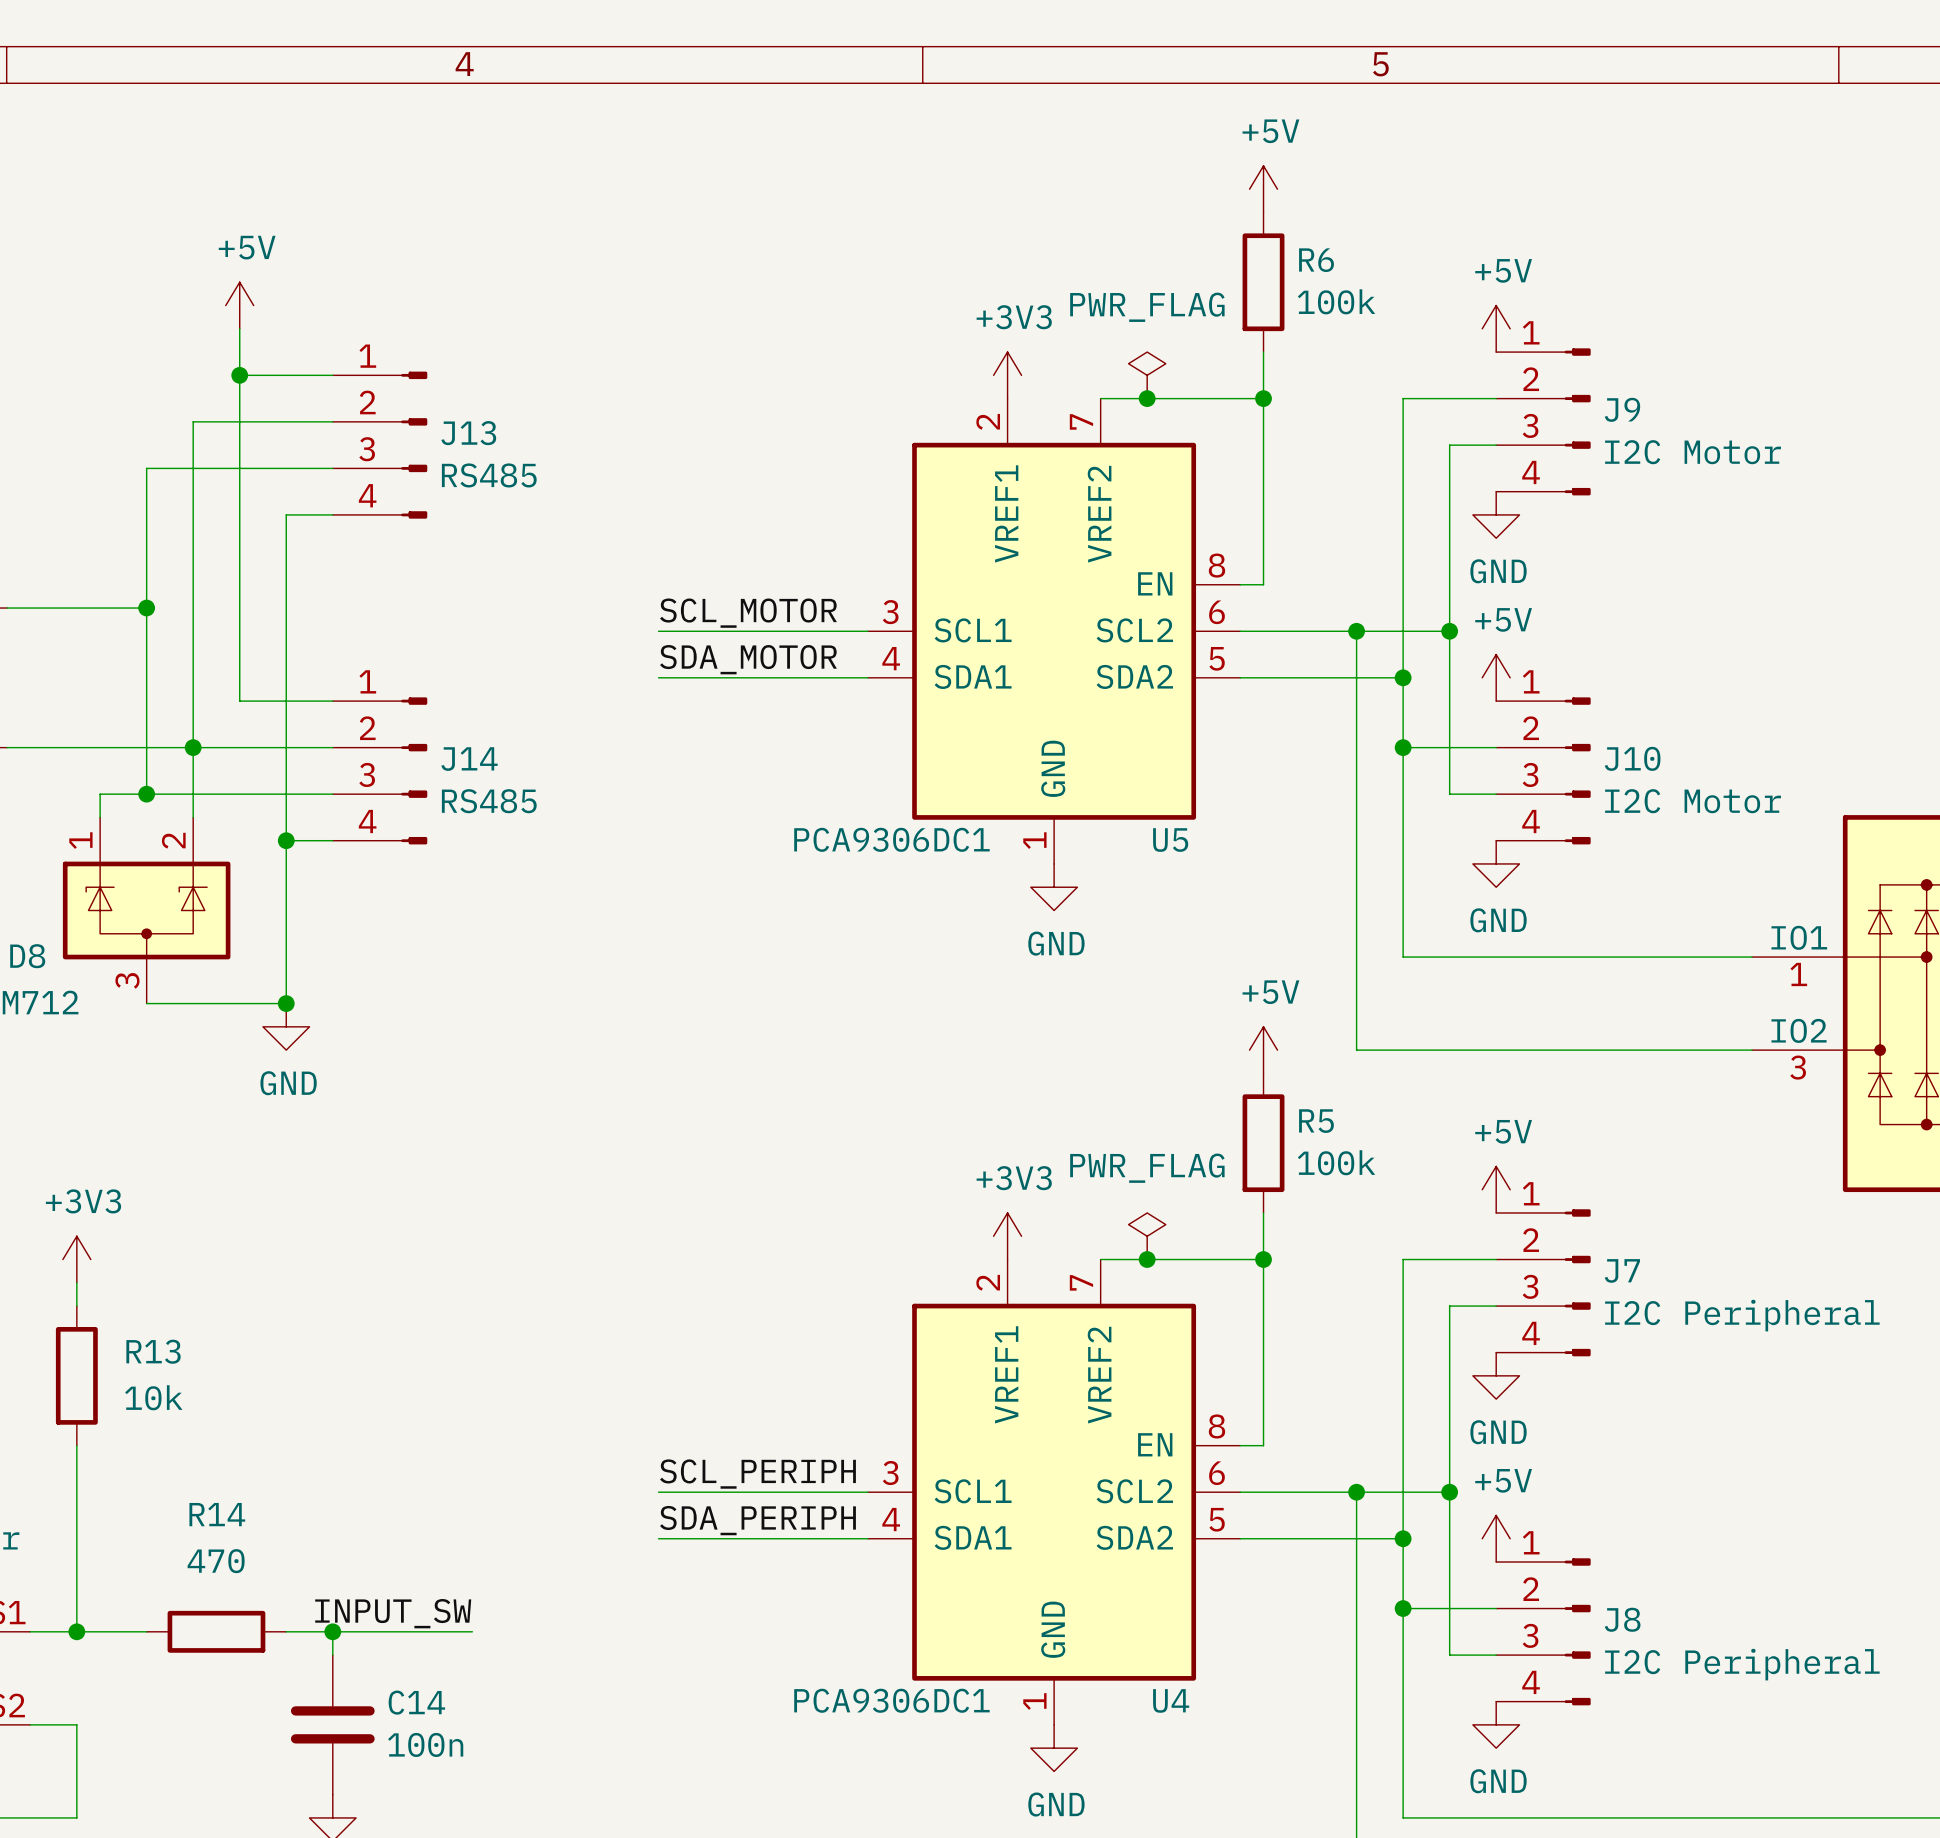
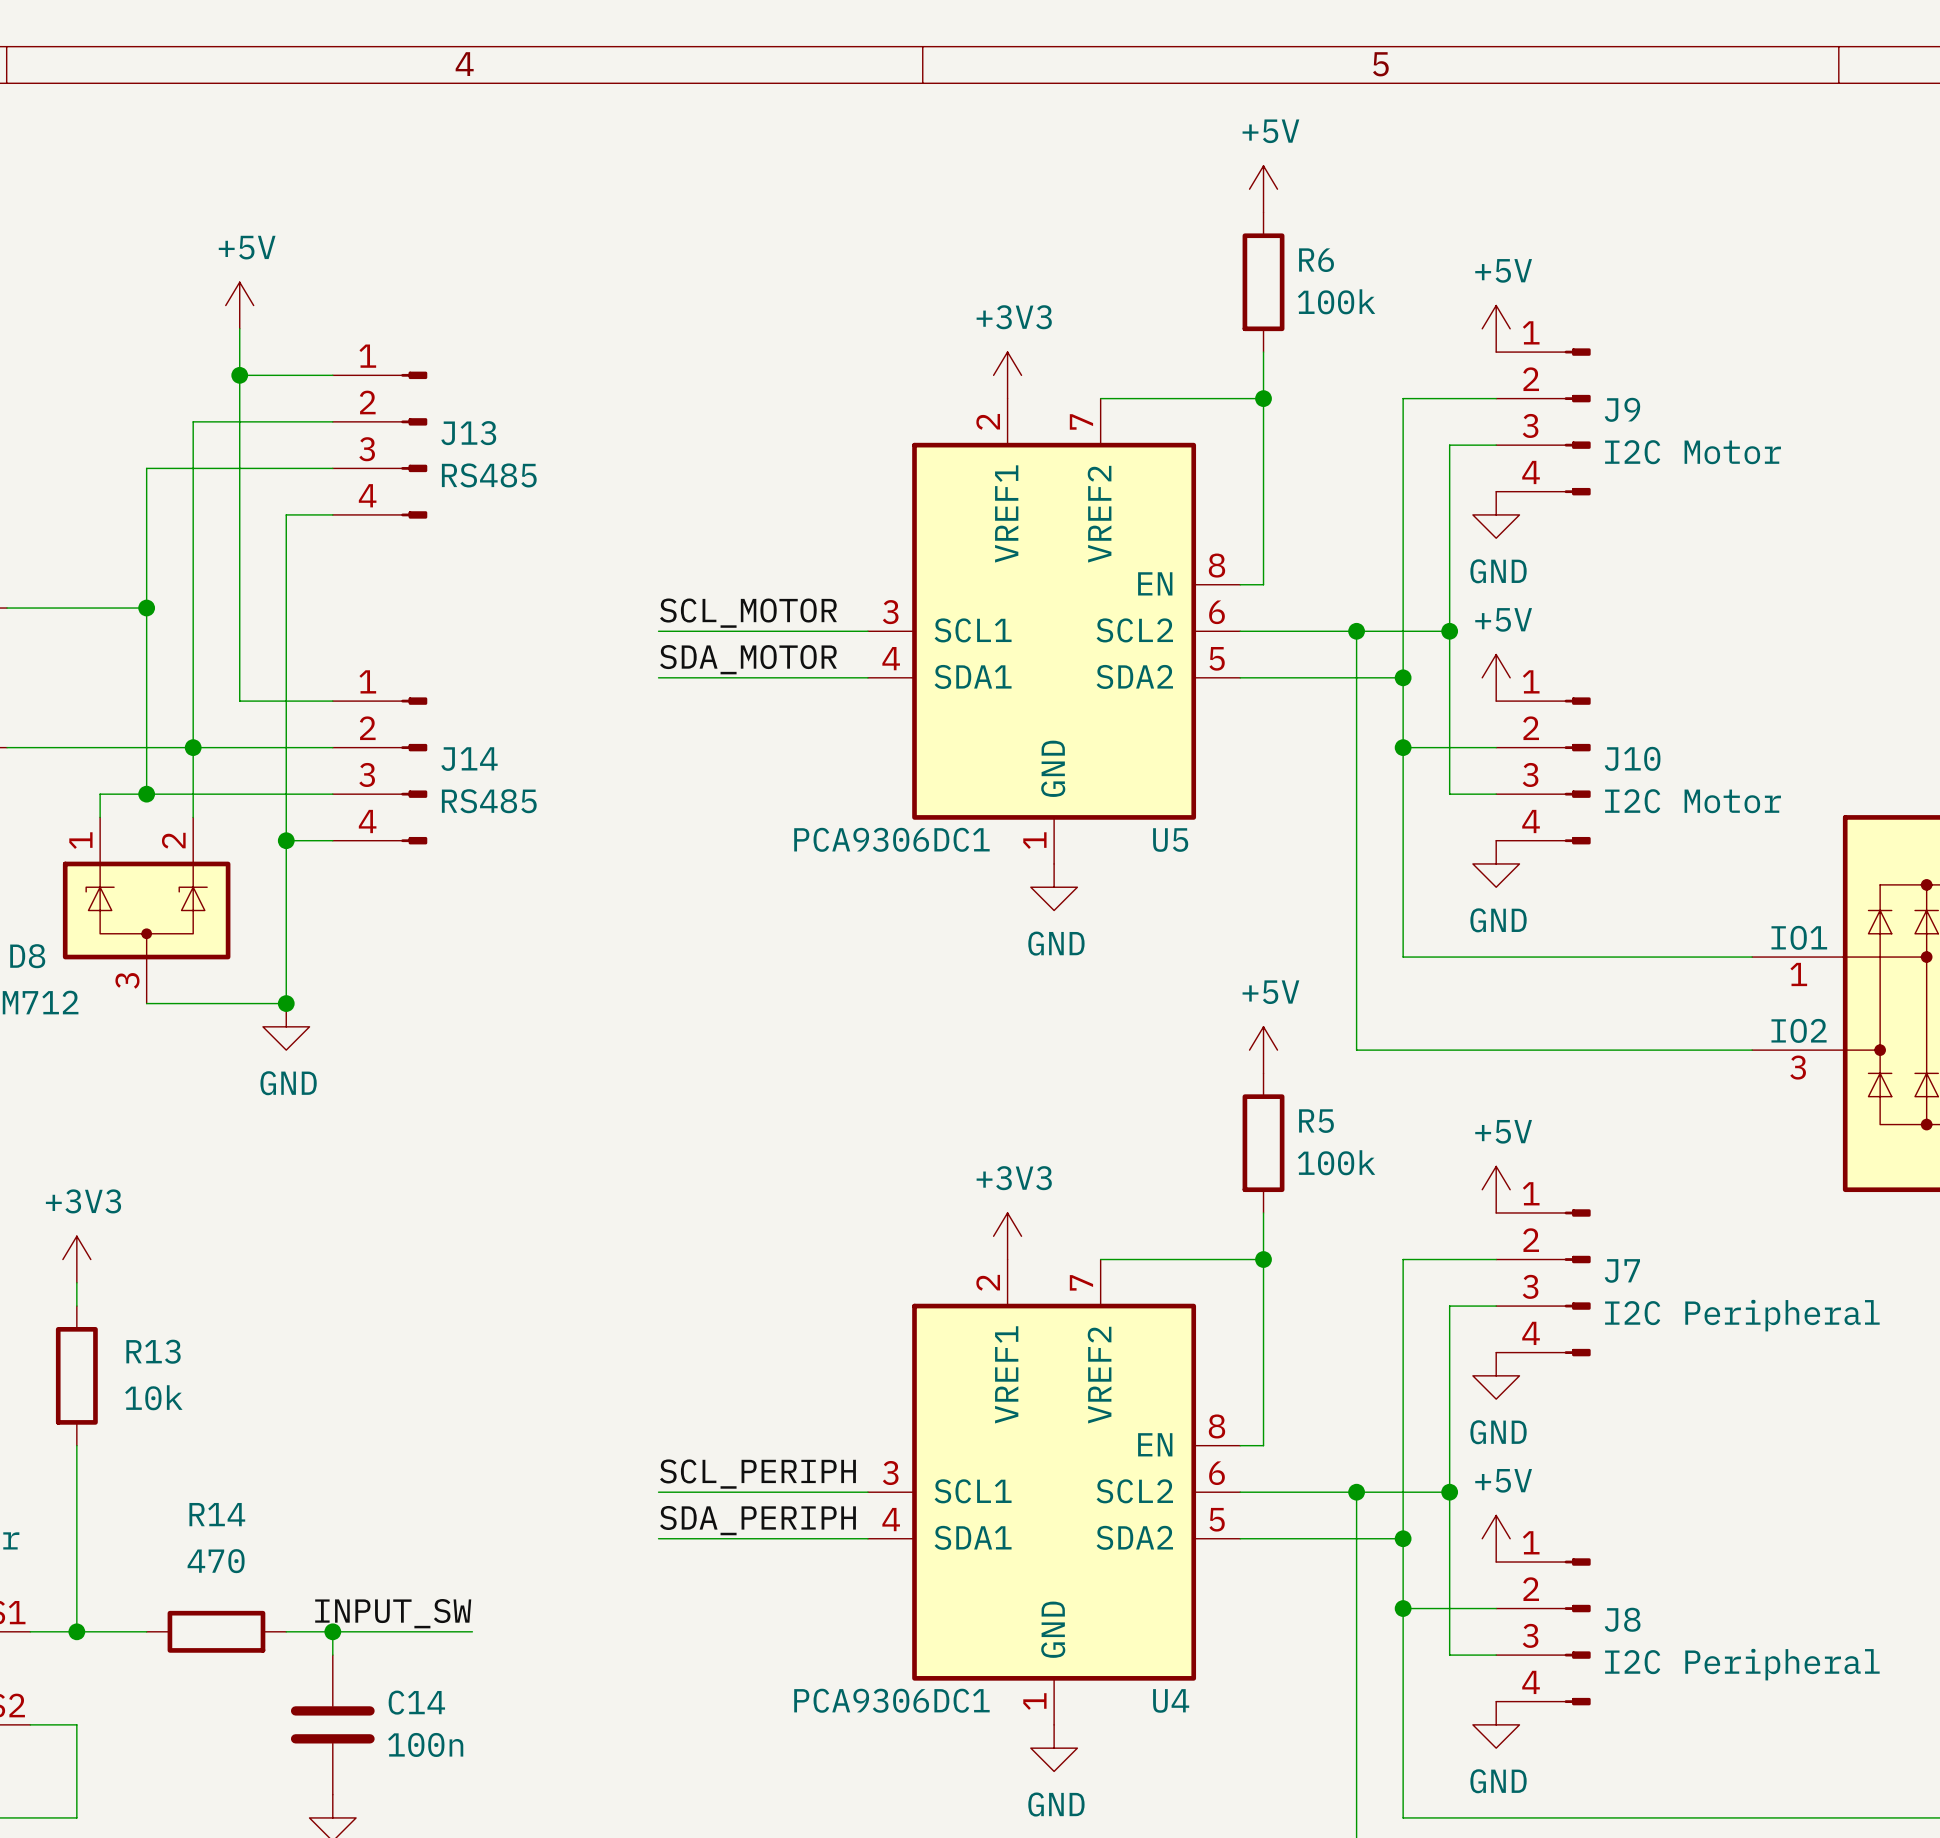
power symbol: PWR_FLAG (1147, 375) -> none
junction: (1147, 398) -> none
power symbol: PWR_FLAG (1147, 1236) -> none
junction: (1147, 1259) -> none

